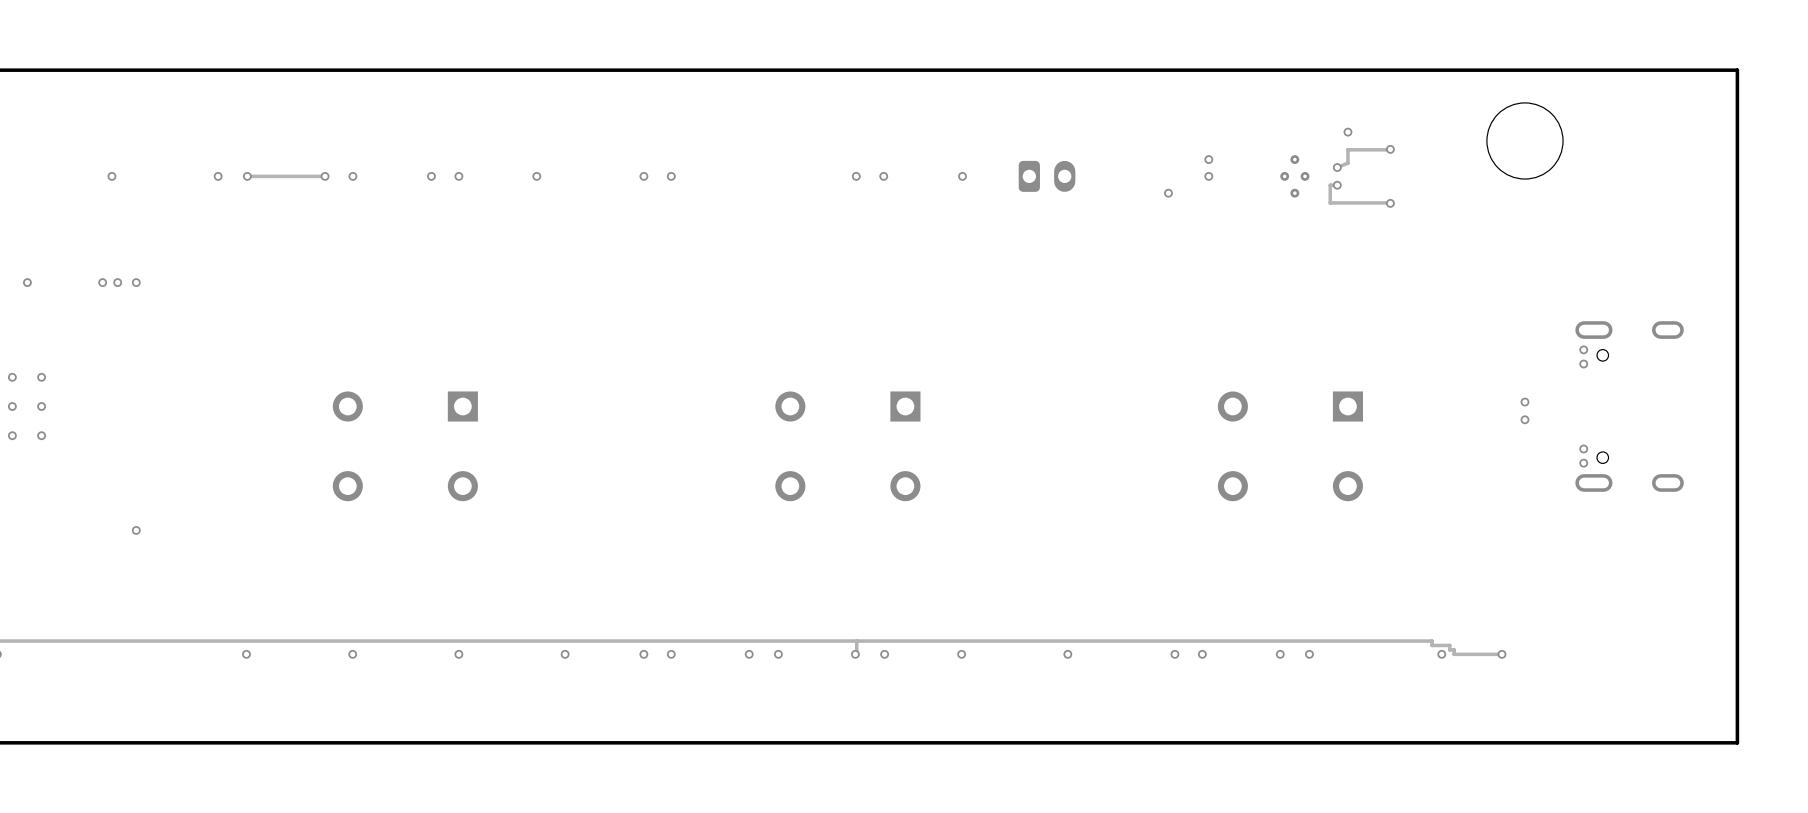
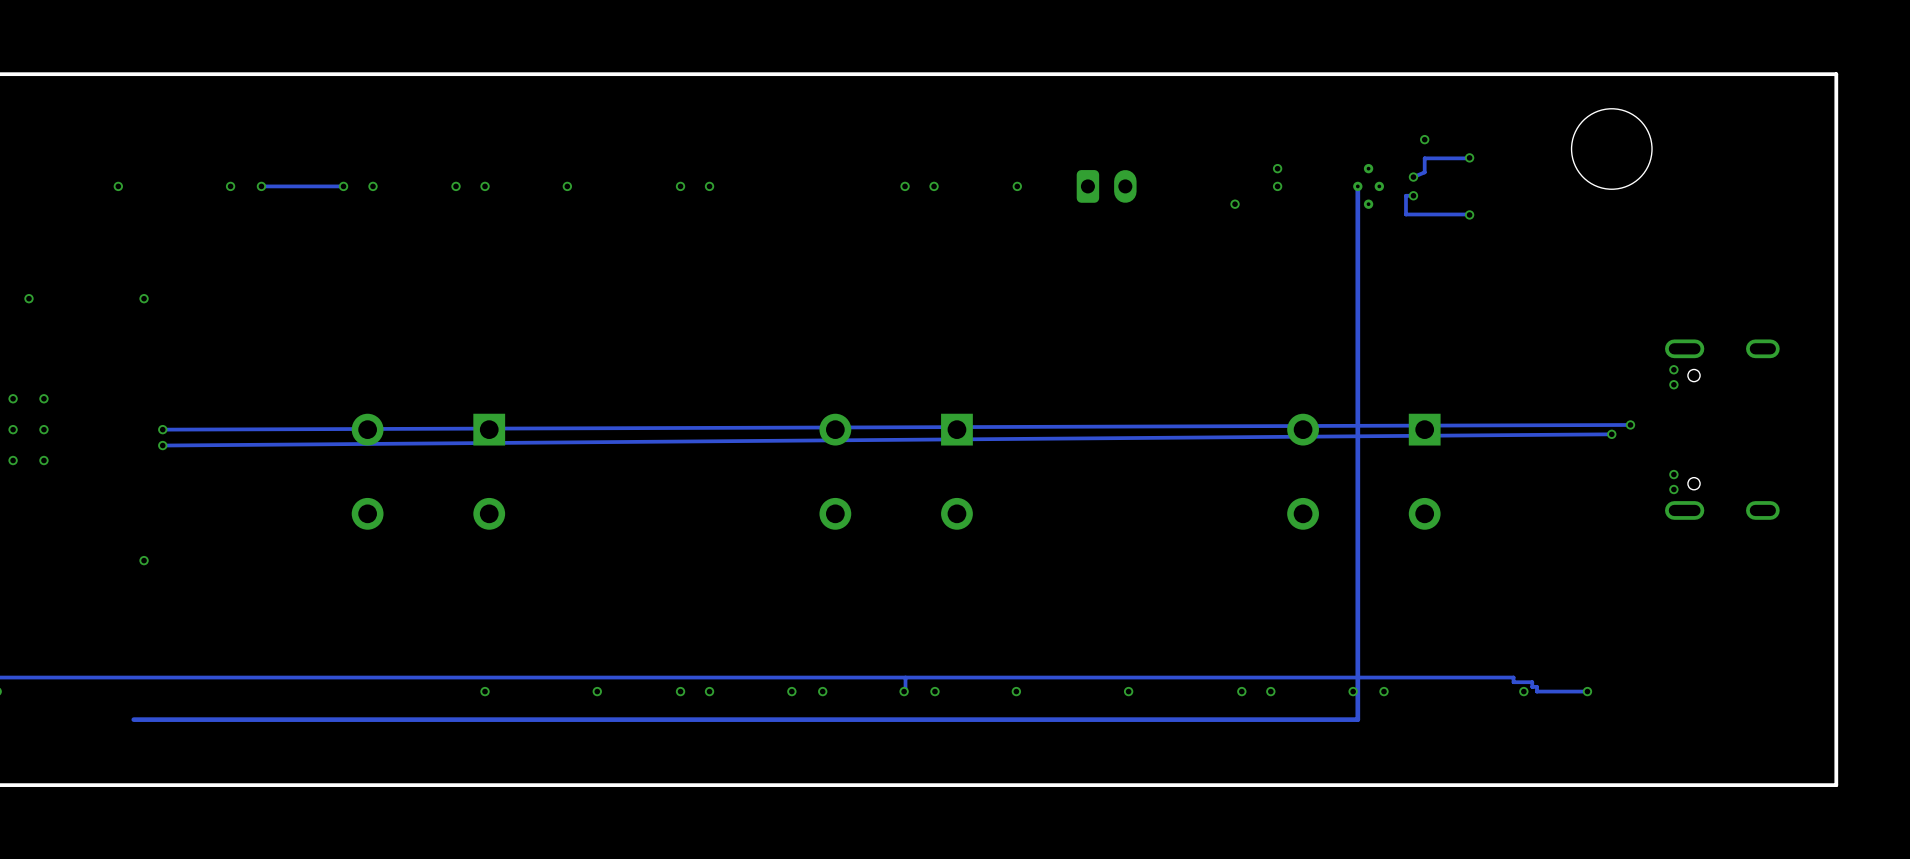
track: none -> (1357, 186) (1357, 719) (133, 719)
via: (102, 282) -> none
via: (117, 282) -> none
via: (1524, 402) -> none
track: none -> (1630, 424) (162, 429)
via: none -> (1630, 424)
via: none -> (162, 429)
track: none -> (1611, 434) (162, 445)
via: none -> (1611, 434)
via: (1524, 419) -> none
via: none -> (162, 445)
via: (246, 654) -> none
via: (352, 654) -> none

